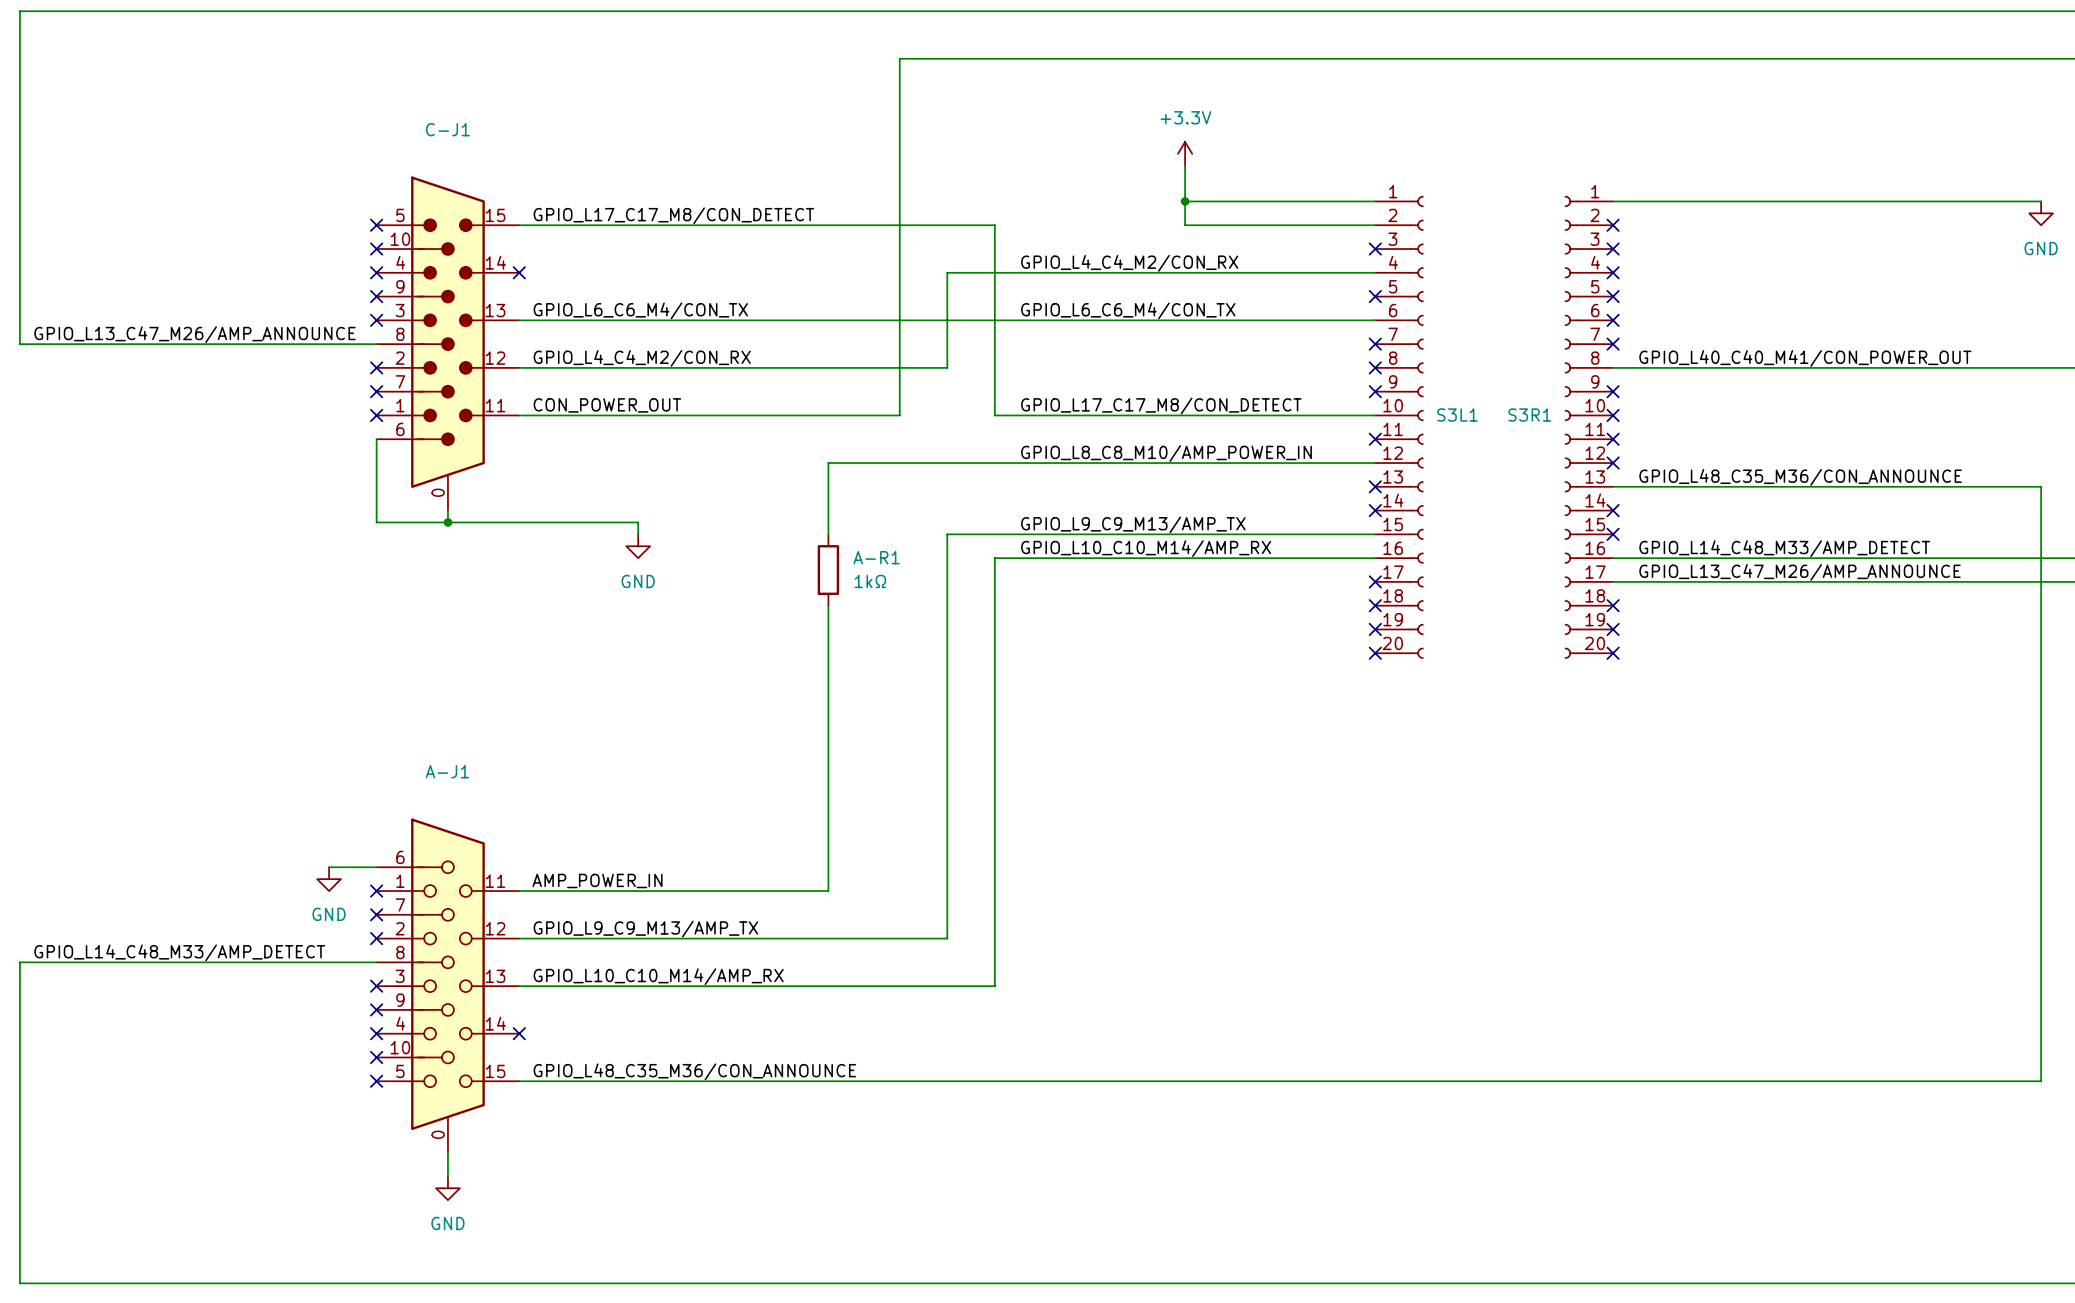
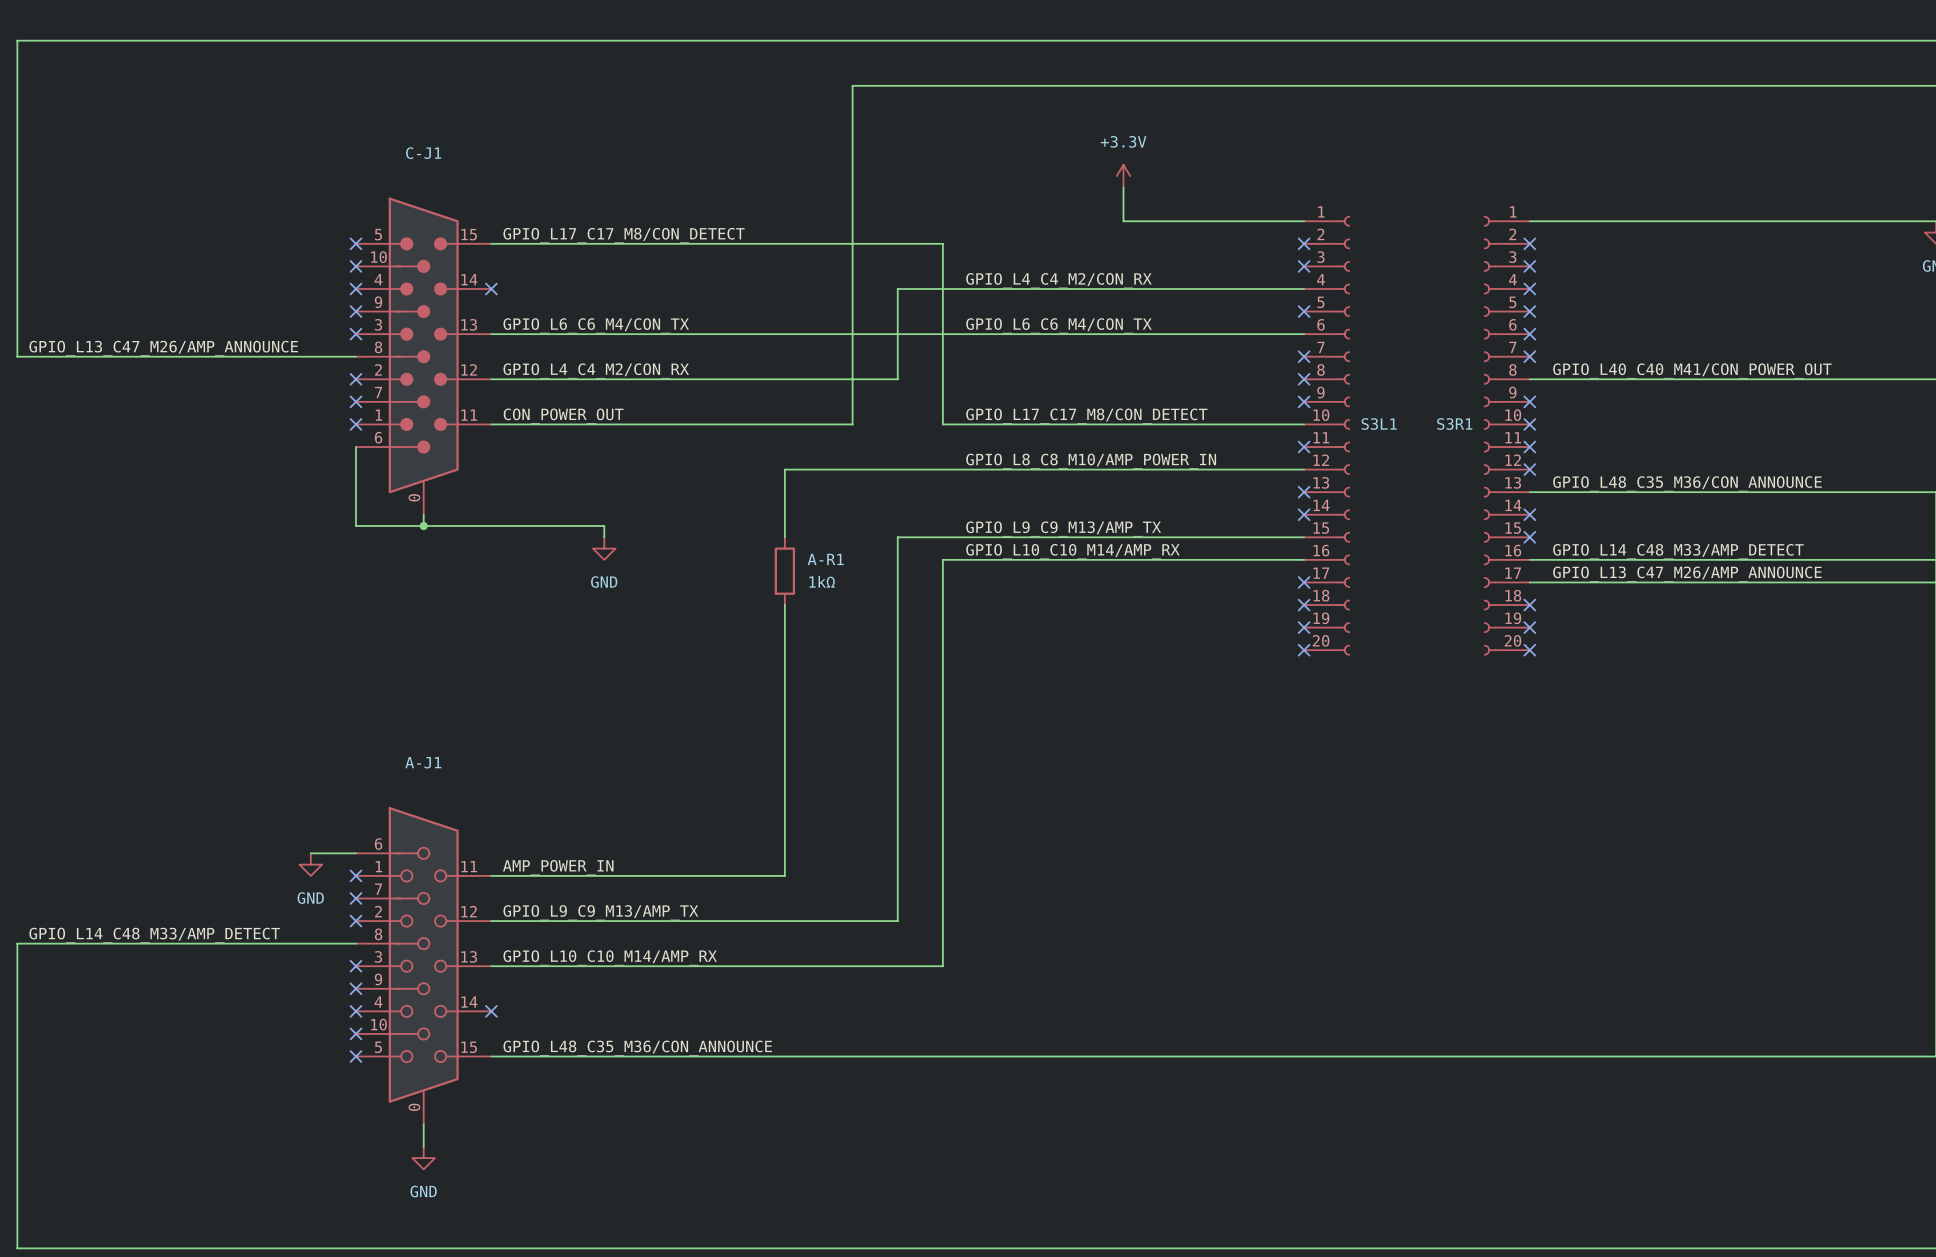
wire: (1185, 201) (1185, 225) (1375, 225) -> none
junction: (1185, 201) -> none
no-connect mark: none -> (1304, 243)

